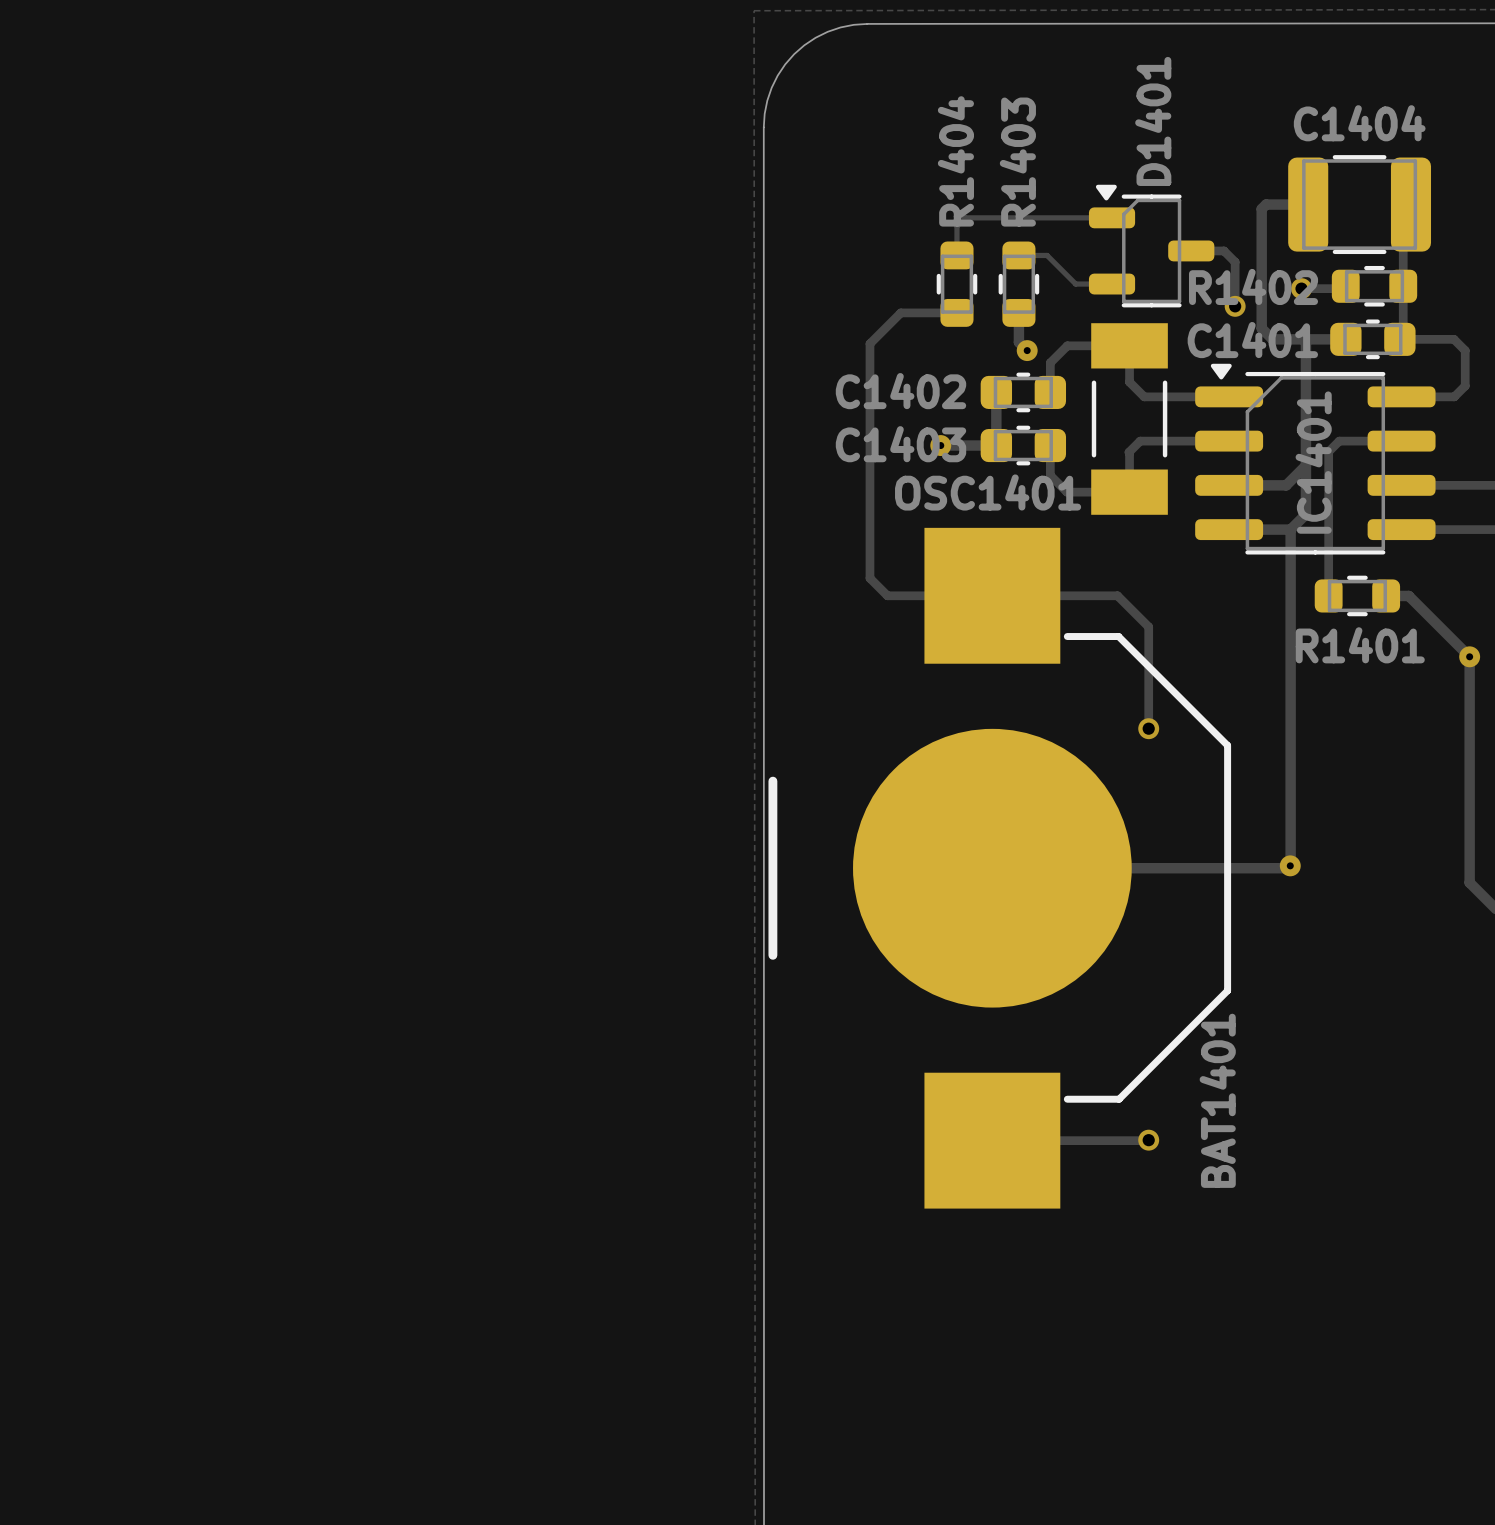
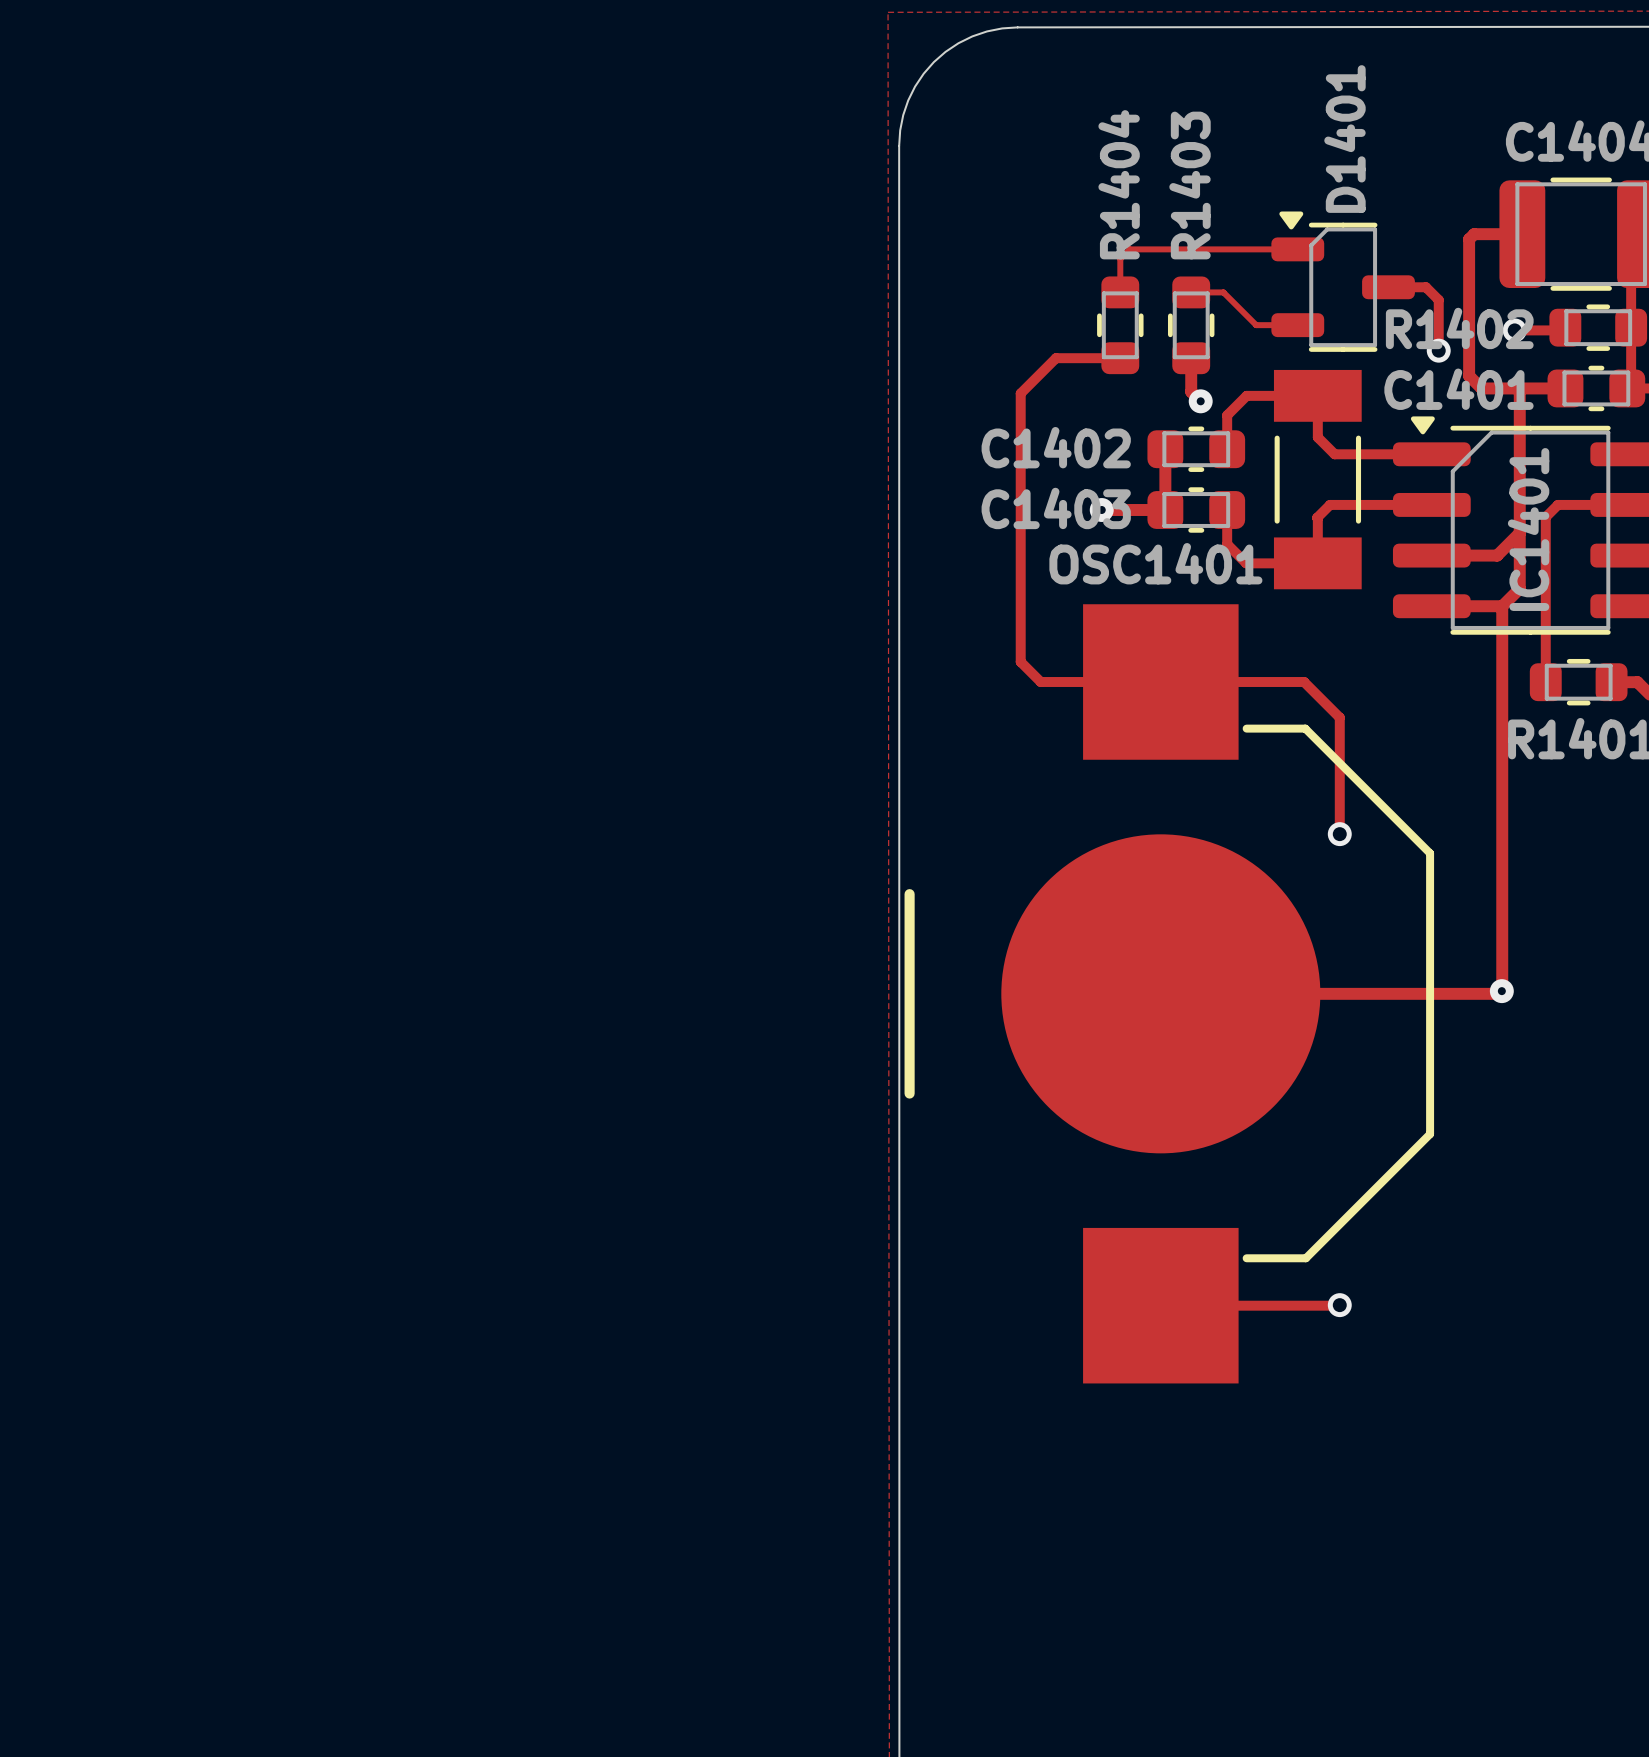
BAT1401 name: BAT1401 (1217, 1100) -> none

